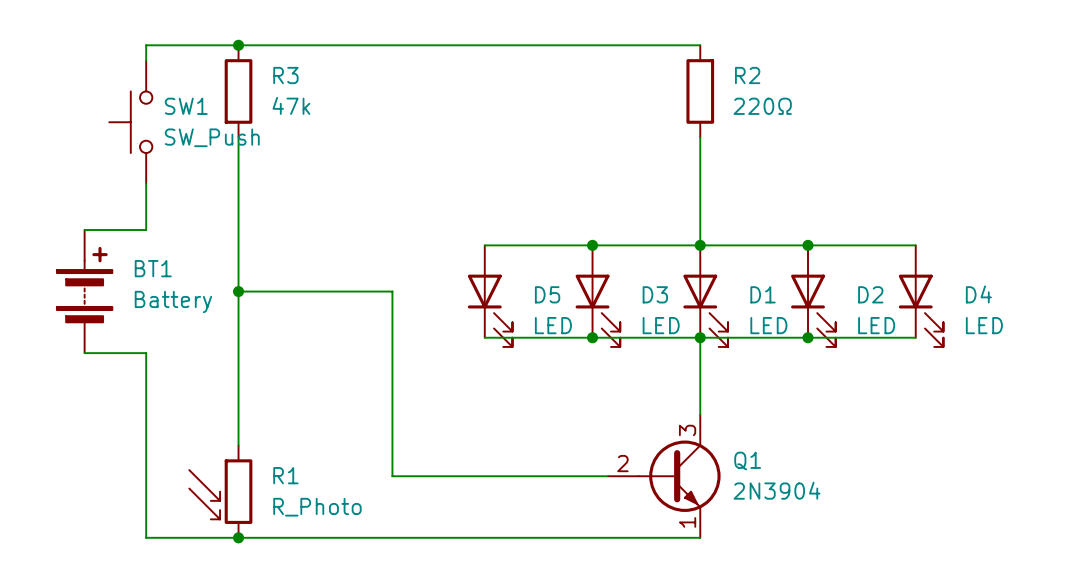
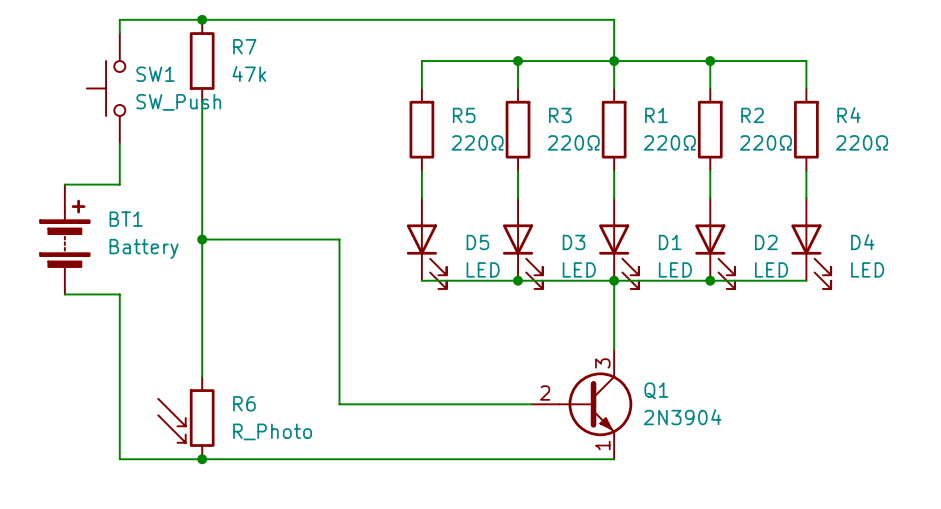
R3 name: R3 (285, 75) -> R7 (244, 46)
wire: none -> (518, 61) (518, 88)
junction: none -> (518, 61)
junction: none -> (614, 61)
R2 position: (700, 91) -> (710, 129)
wire: none -> (710, 61) (710, 88)
junction: none -> (710, 61)
wire: none -> (421, 88) (421, 61) (806, 61) (806, 88)
wire: (700, 137) (700, 214) -> (614, 19) (614, 88)
R5: none -> 220Ω (421, 129)
R3: none -> 220Ω (518, 129)
R1: none -> 220Ω (614, 129)
R4: none -> 220Ω (806, 129)
wire: none -> (518, 170) (518, 198)
wire: none -> (710, 170) (710, 198)
wire: none -> (806, 170) (806, 198)
wire: (484, 245) (915, 245) -> (421, 198) (421, 170)
junction: (592, 245) -> none
junction: (700, 245) -> none
junction: (808, 245) -> none
R1 name: R1 (285, 475) -> R6 (244, 403)

